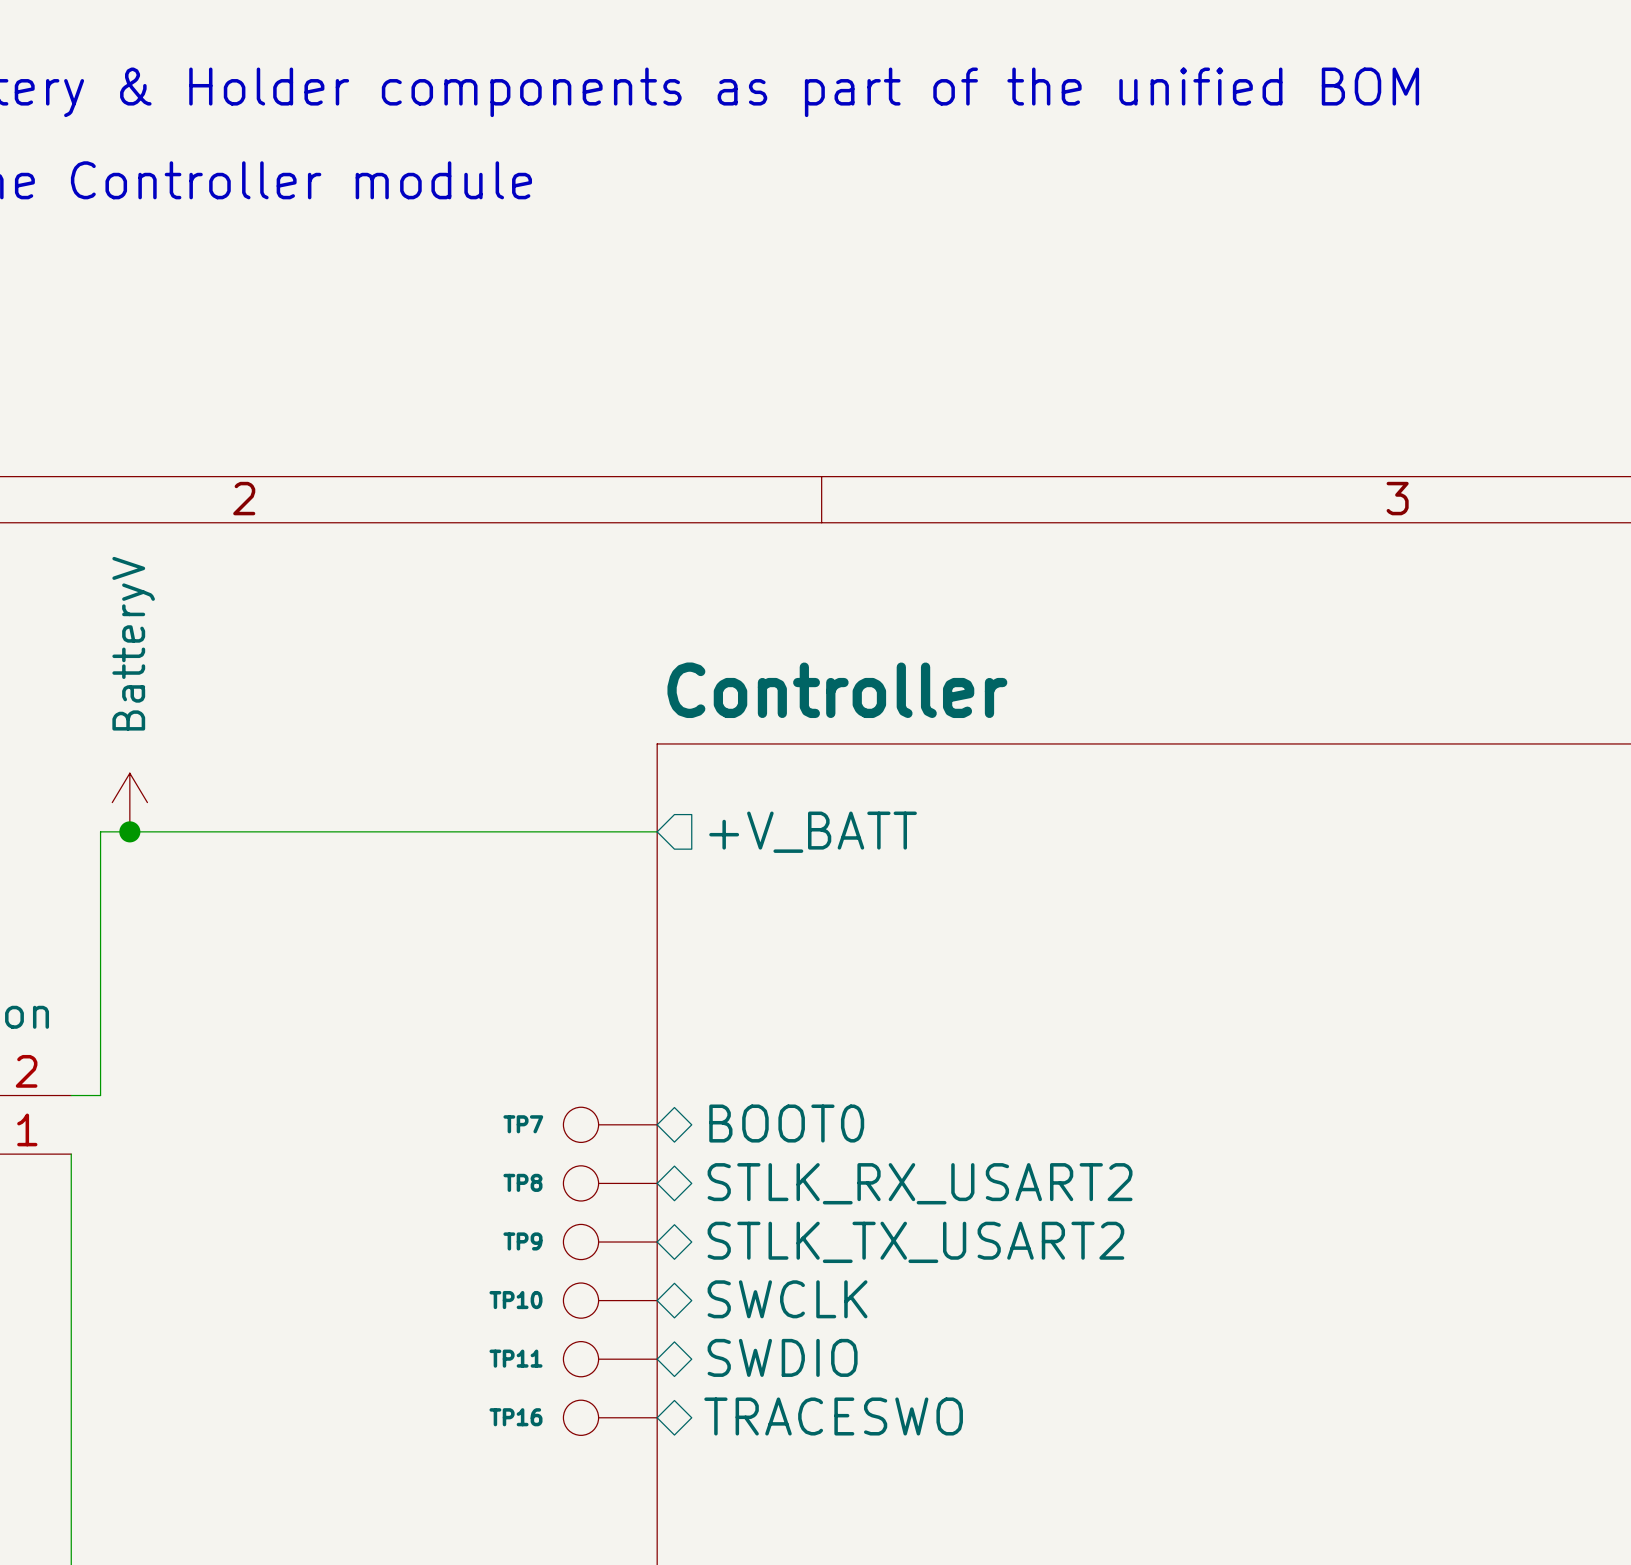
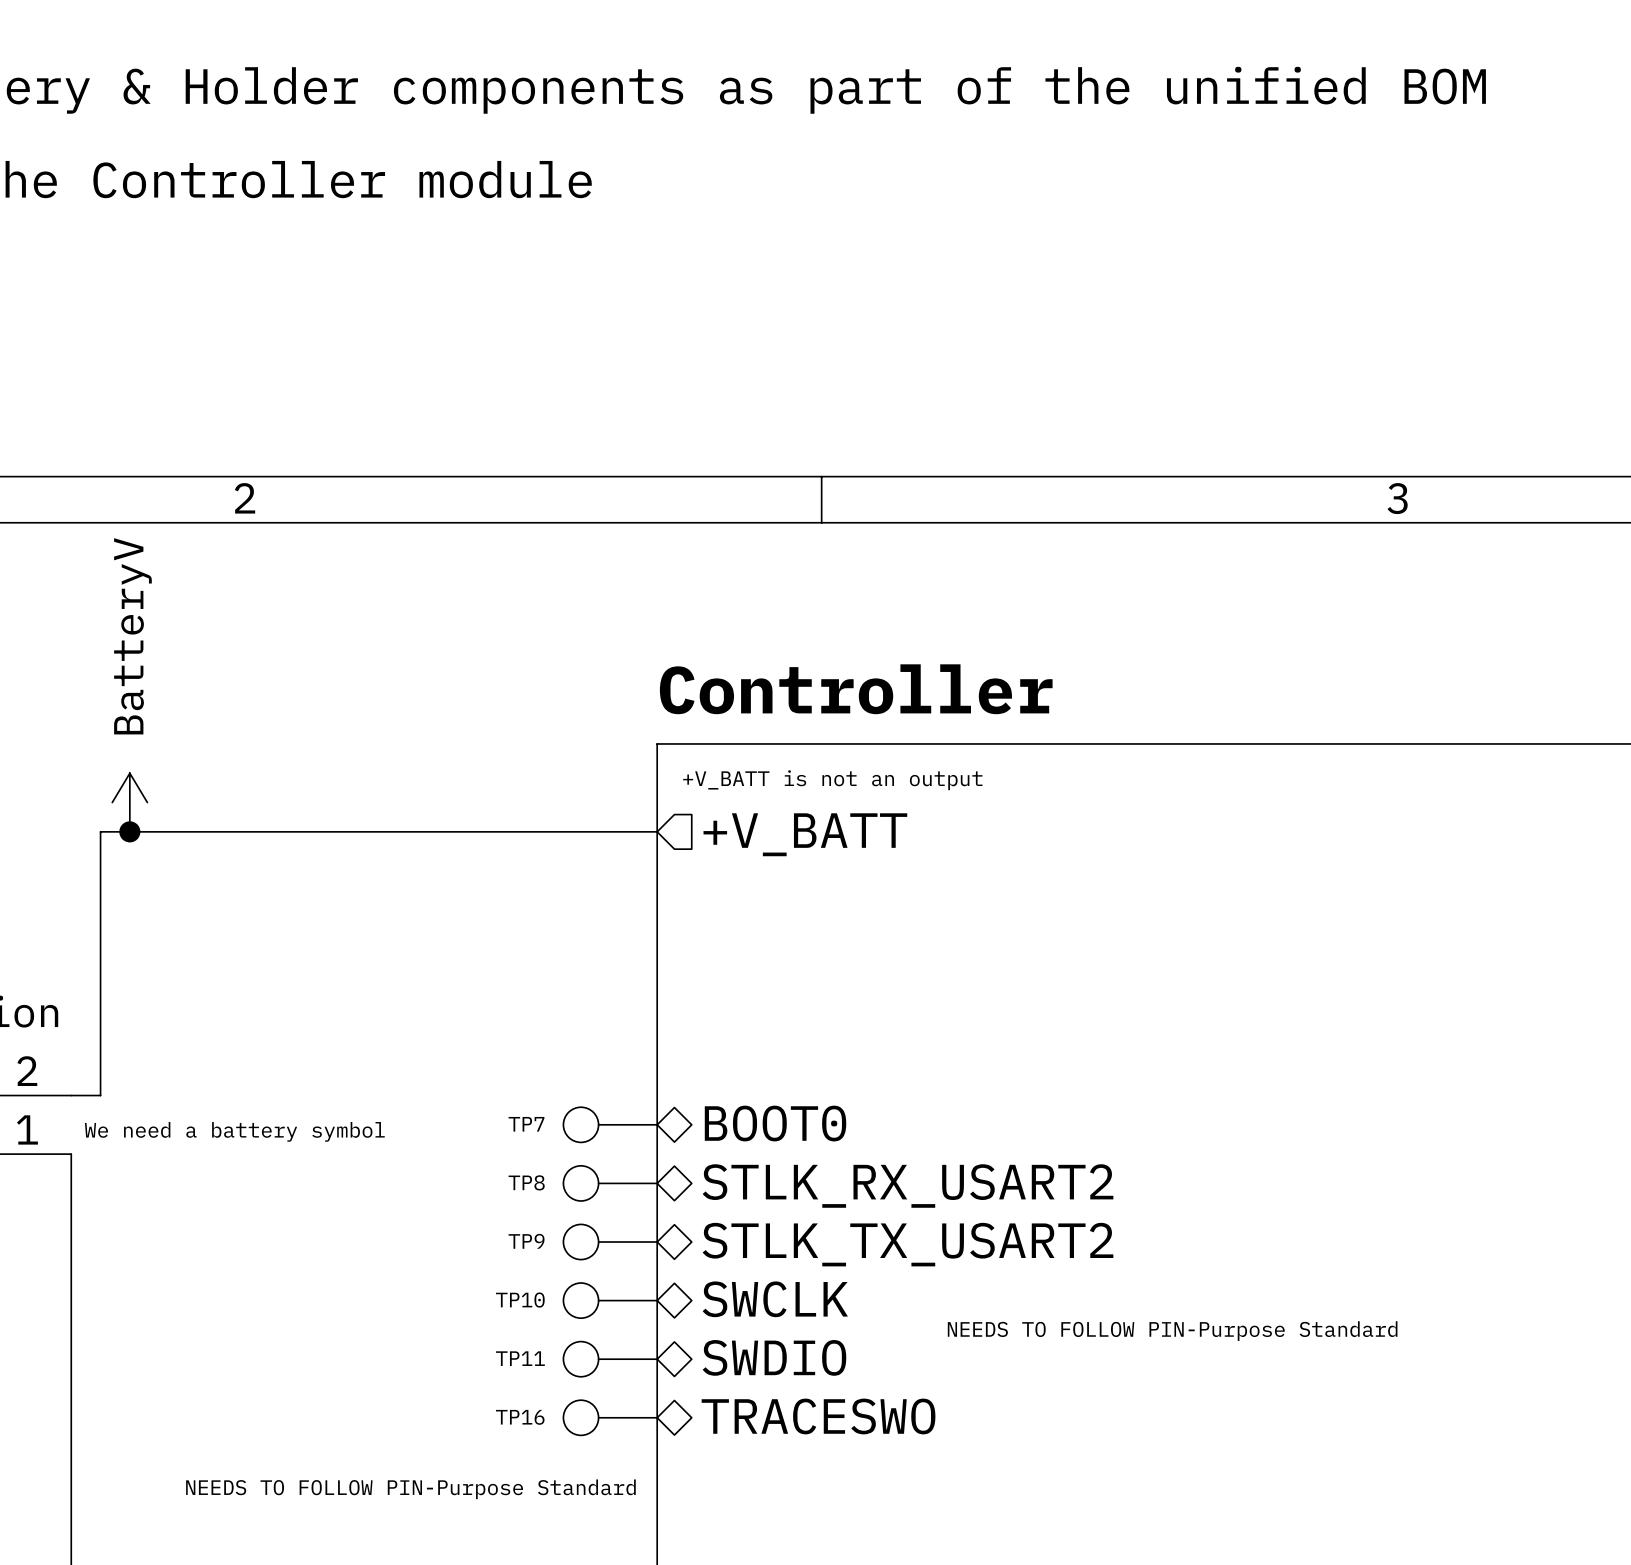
text: none -> +V_BATT is not an output (832, 780)
text: none -> We need a battery symbol (234, 1131)
text: none -> NEEDS TO FOLLOW PIN-Purpose Standard (1172, 1331)
text: none -> NEEDS TO FOLLOW PIN-Purpose Standard (410, 1489)

